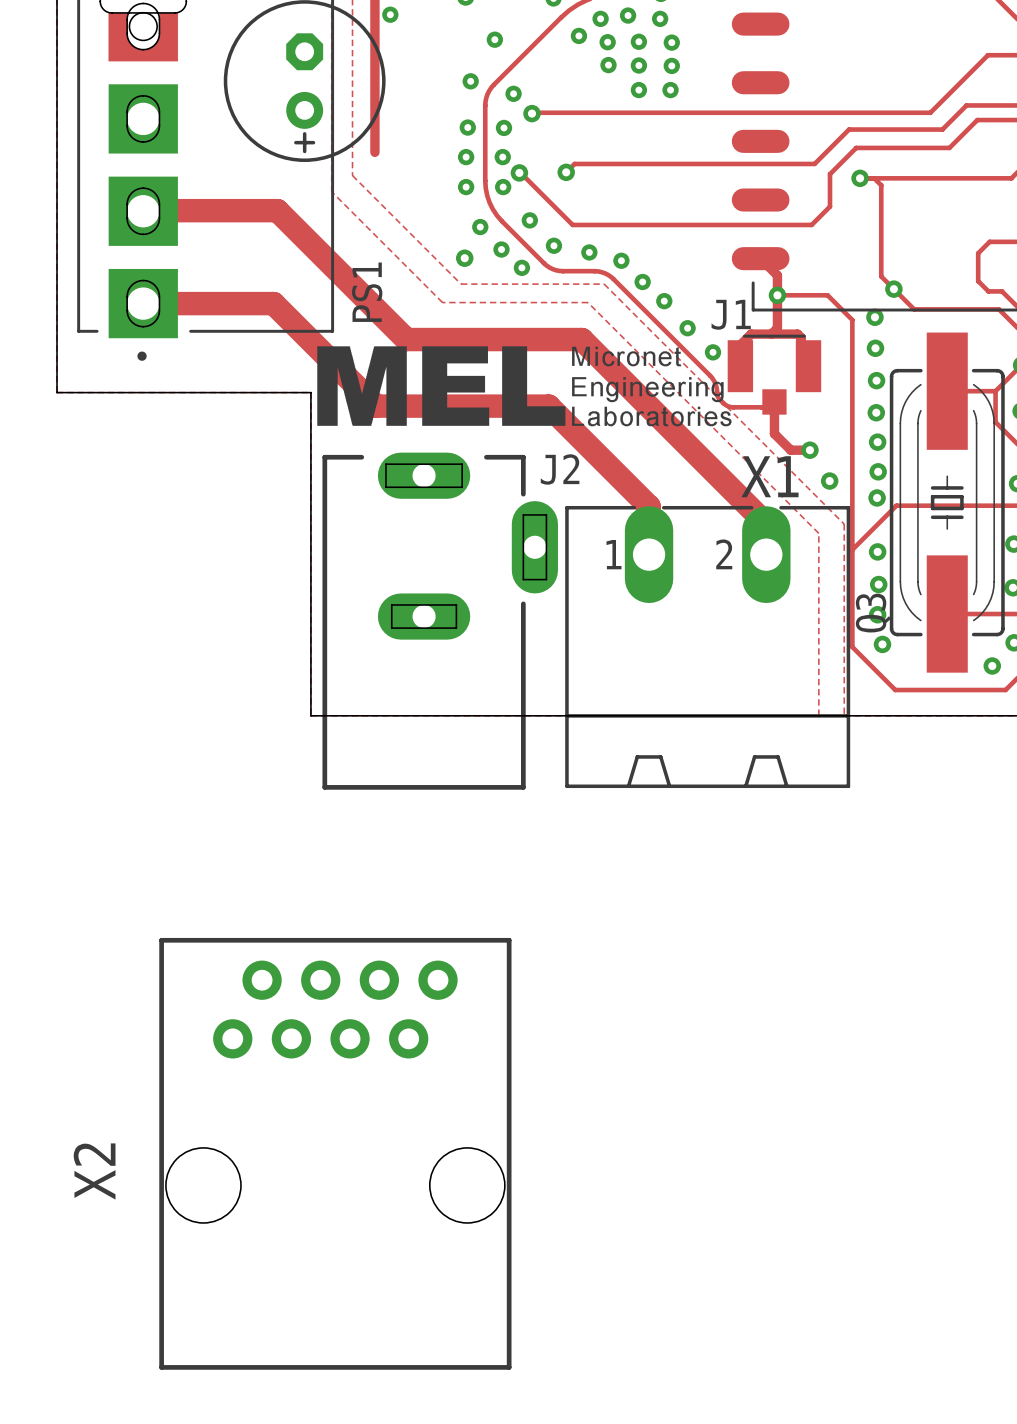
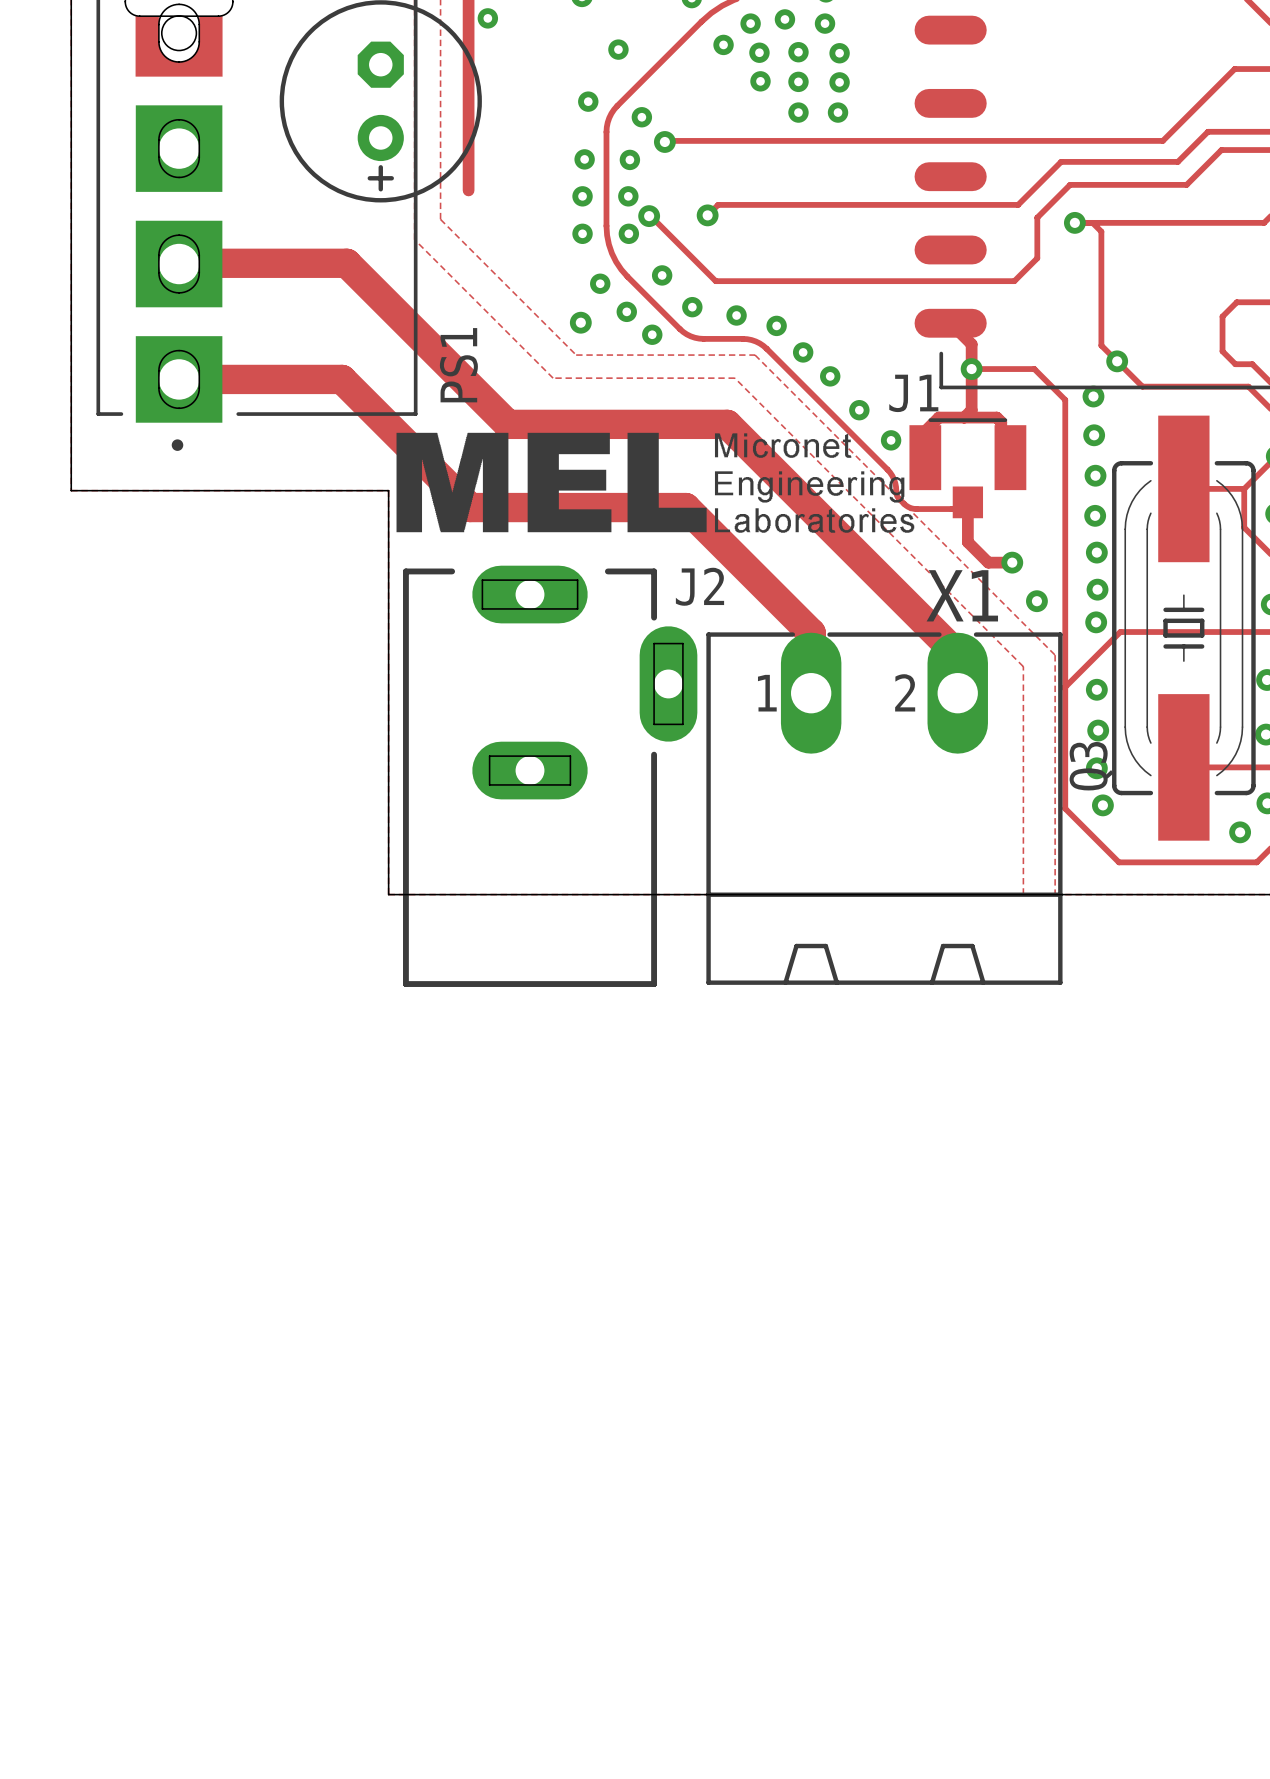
X2: (335, 1153) -> none

